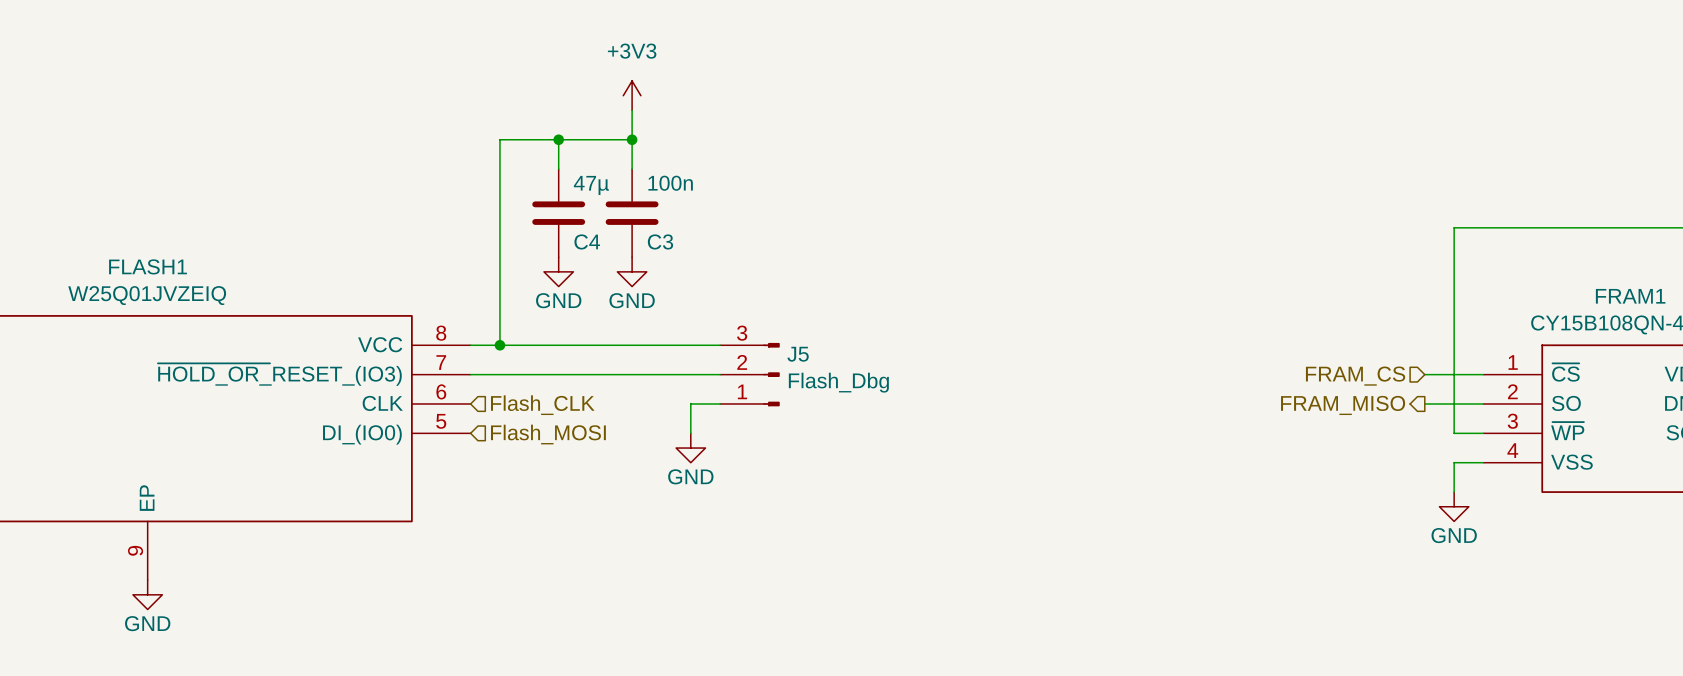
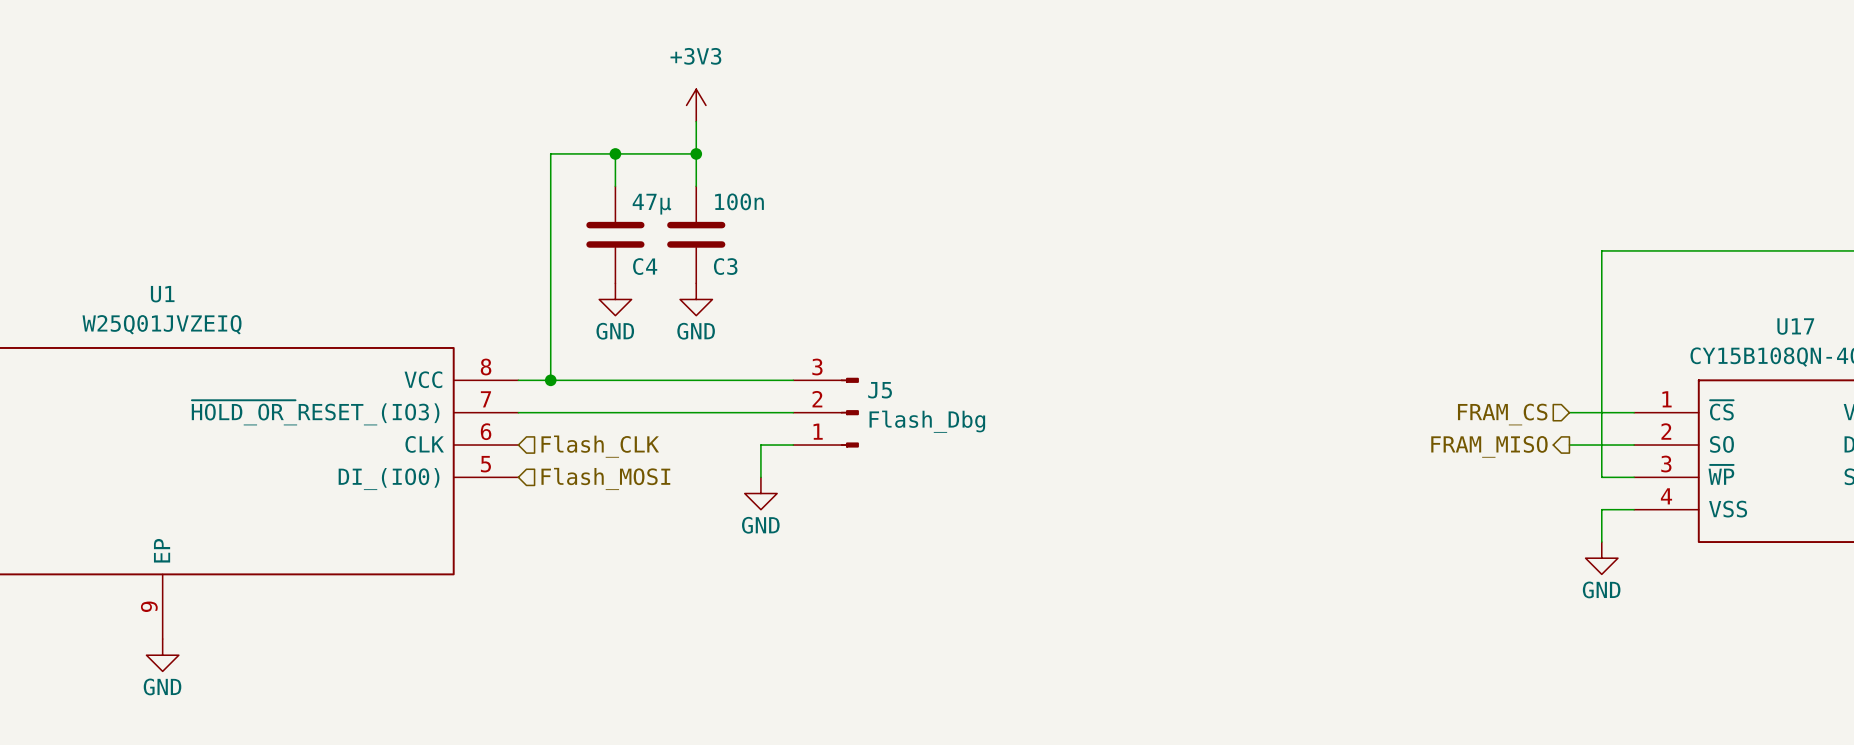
FLASH1 name: FLASH1 (148, 266) -> U1 (162, 294)
FRAM1 name: FRAM1 (1630, 296) -> U17 (1795, 326)

